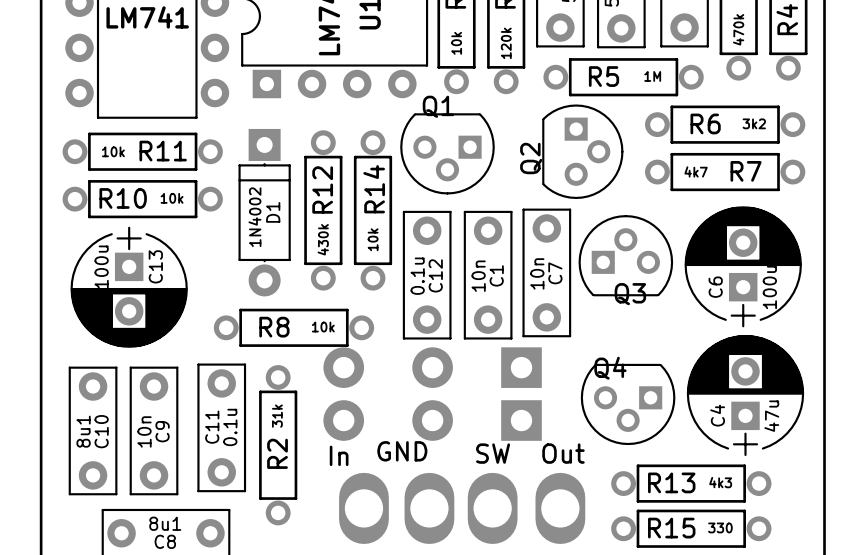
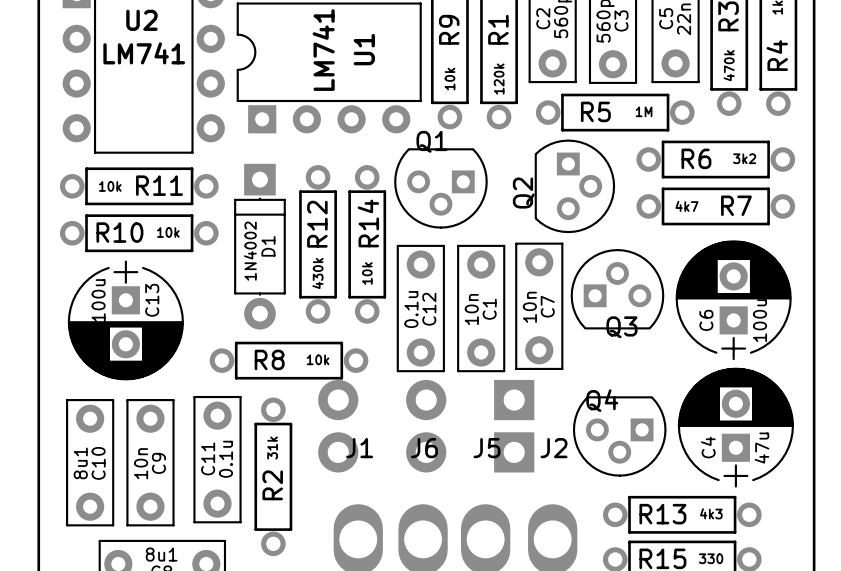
GND name: GND (402, 451) -> J6 (424, 448)
SW name: SW (493, 453) -> J5 (486, 448)
Out name: Out (563, 453) -> J2 (554, 448)
In name: In (339, 455) -> J1 (359, 448)

